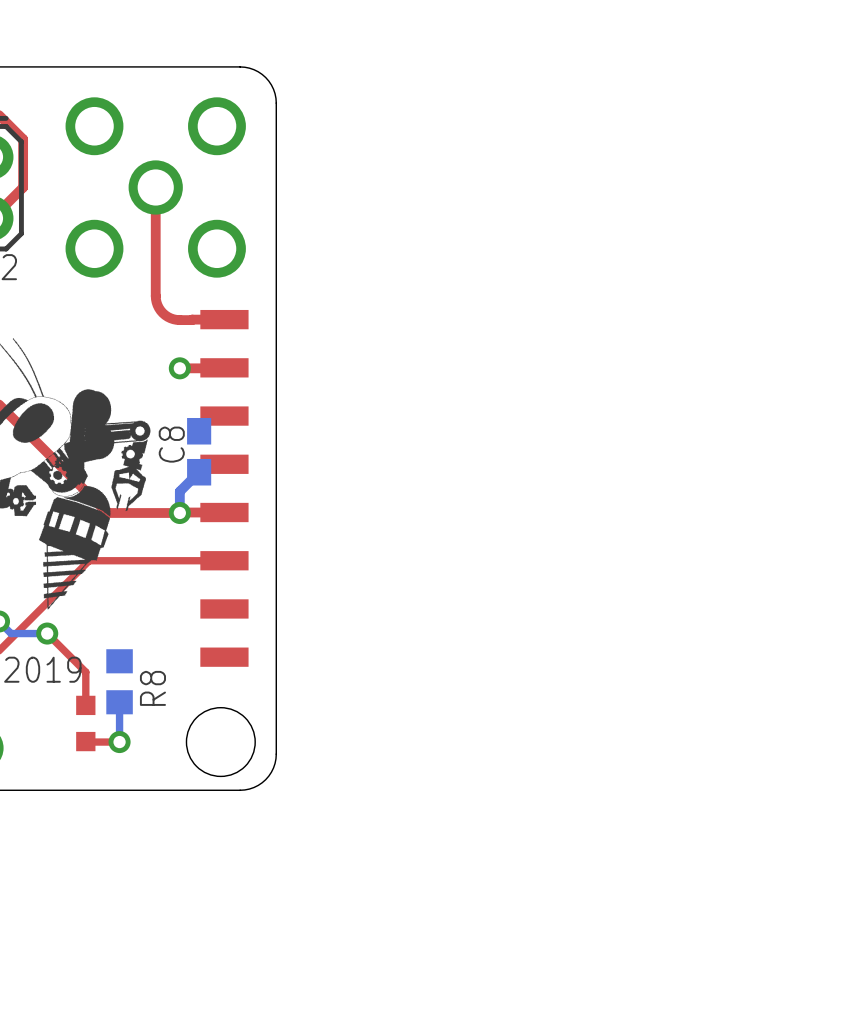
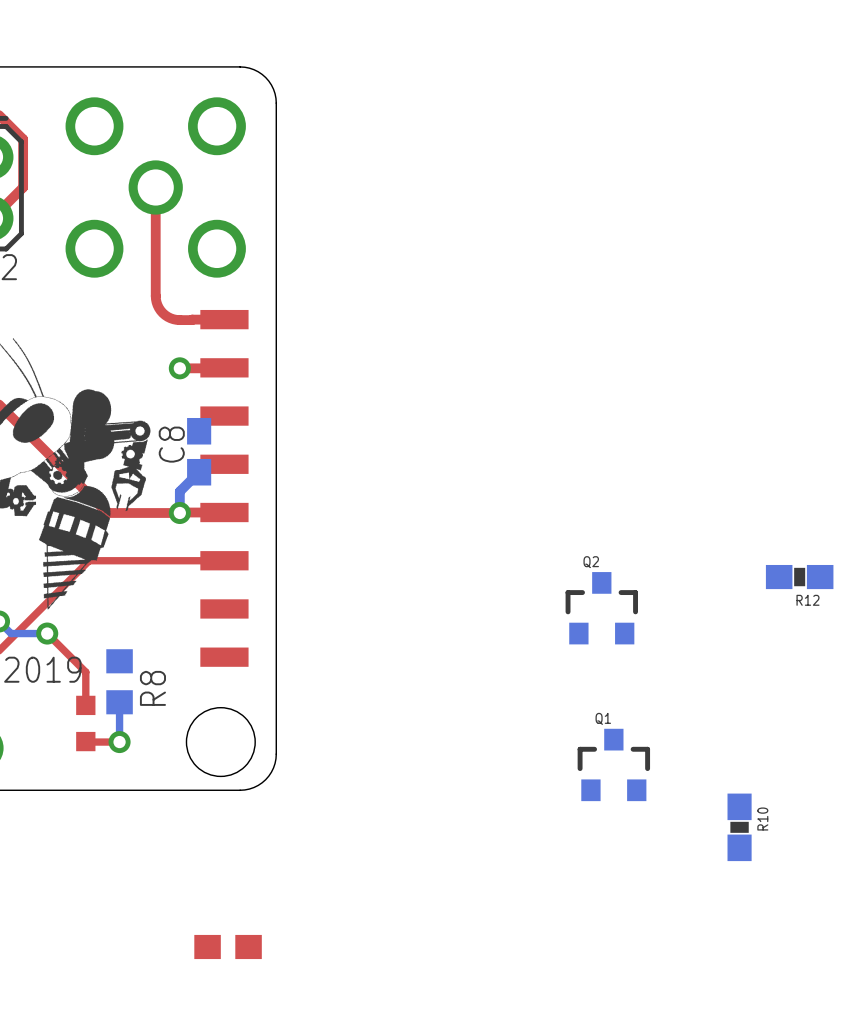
R12: none -> (799, 577)
Q2: none -> (601, 608)
Q1: none -> (613, 764)
R10: none -> (739, 827)
part: none -> (228, 946)

